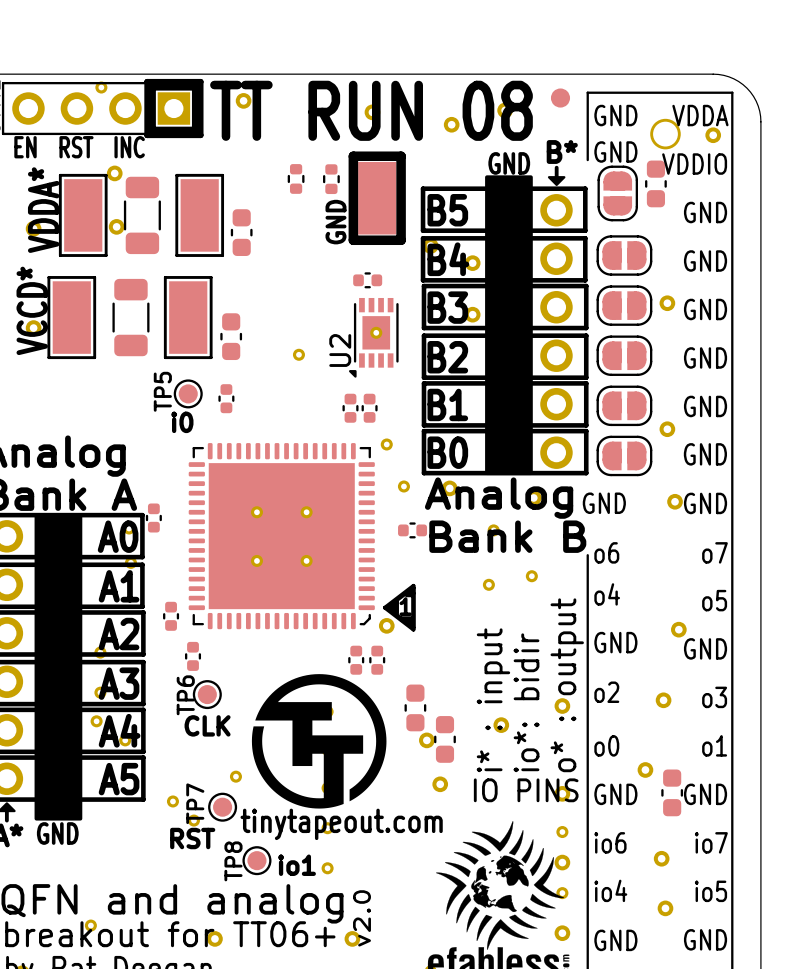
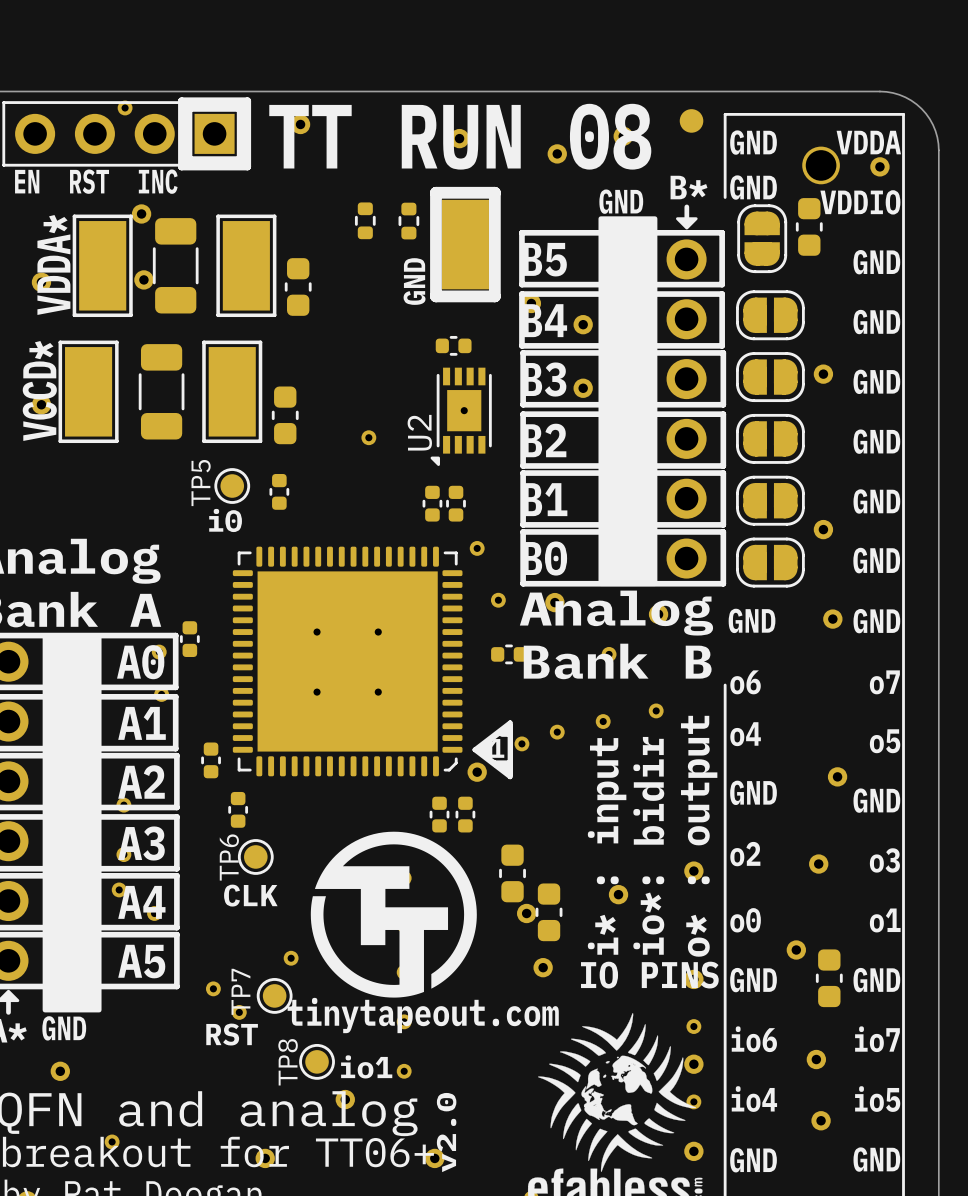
part: none -> (557, 732)
part: none -> (521, 743)
part: none -> (60, 1071)
part: none -> (345, 1099)

